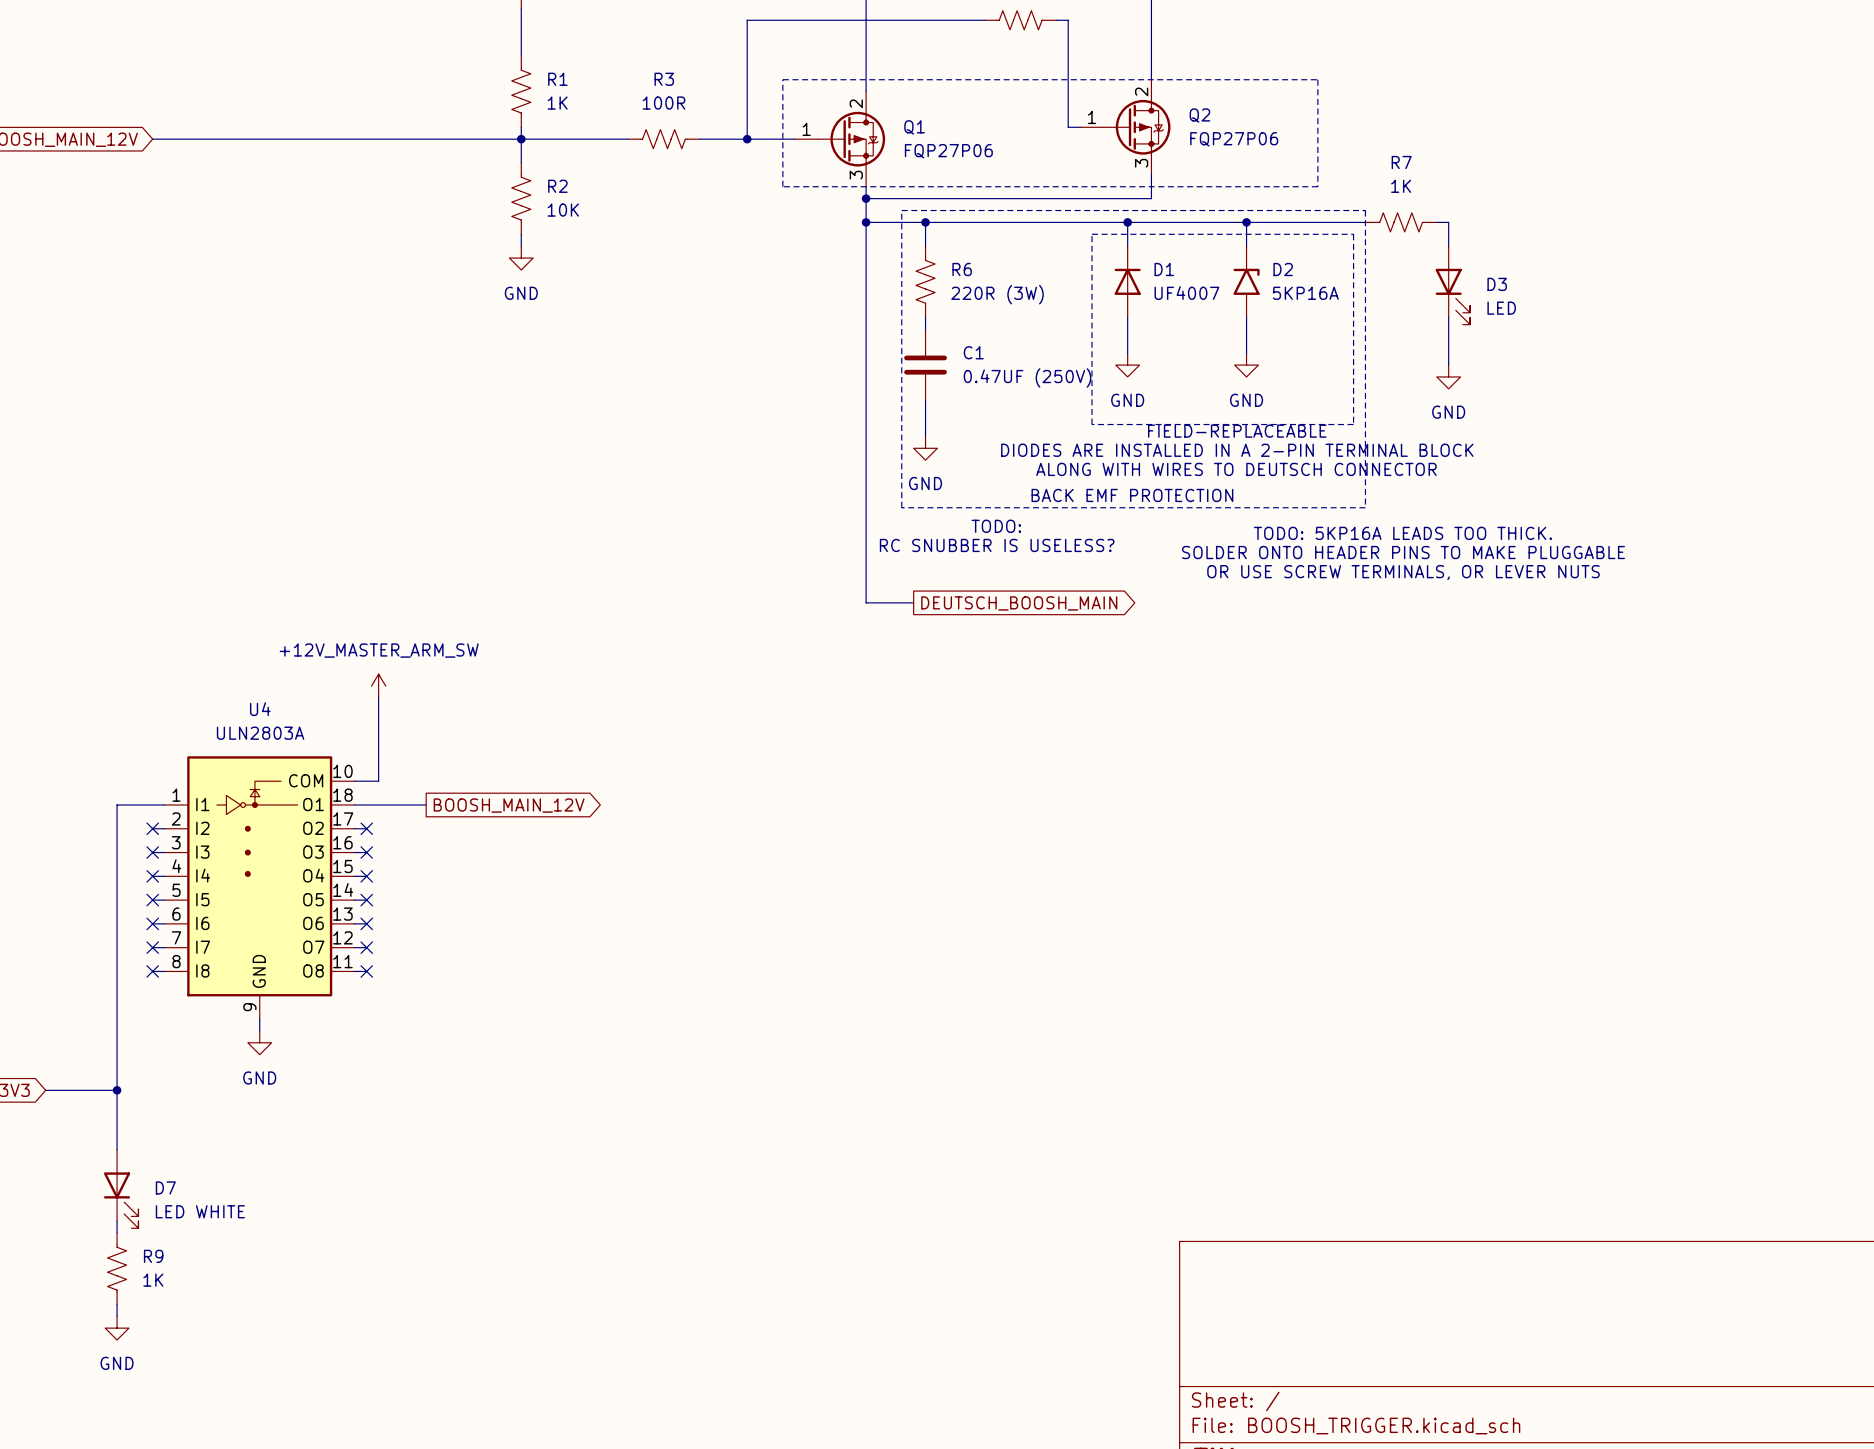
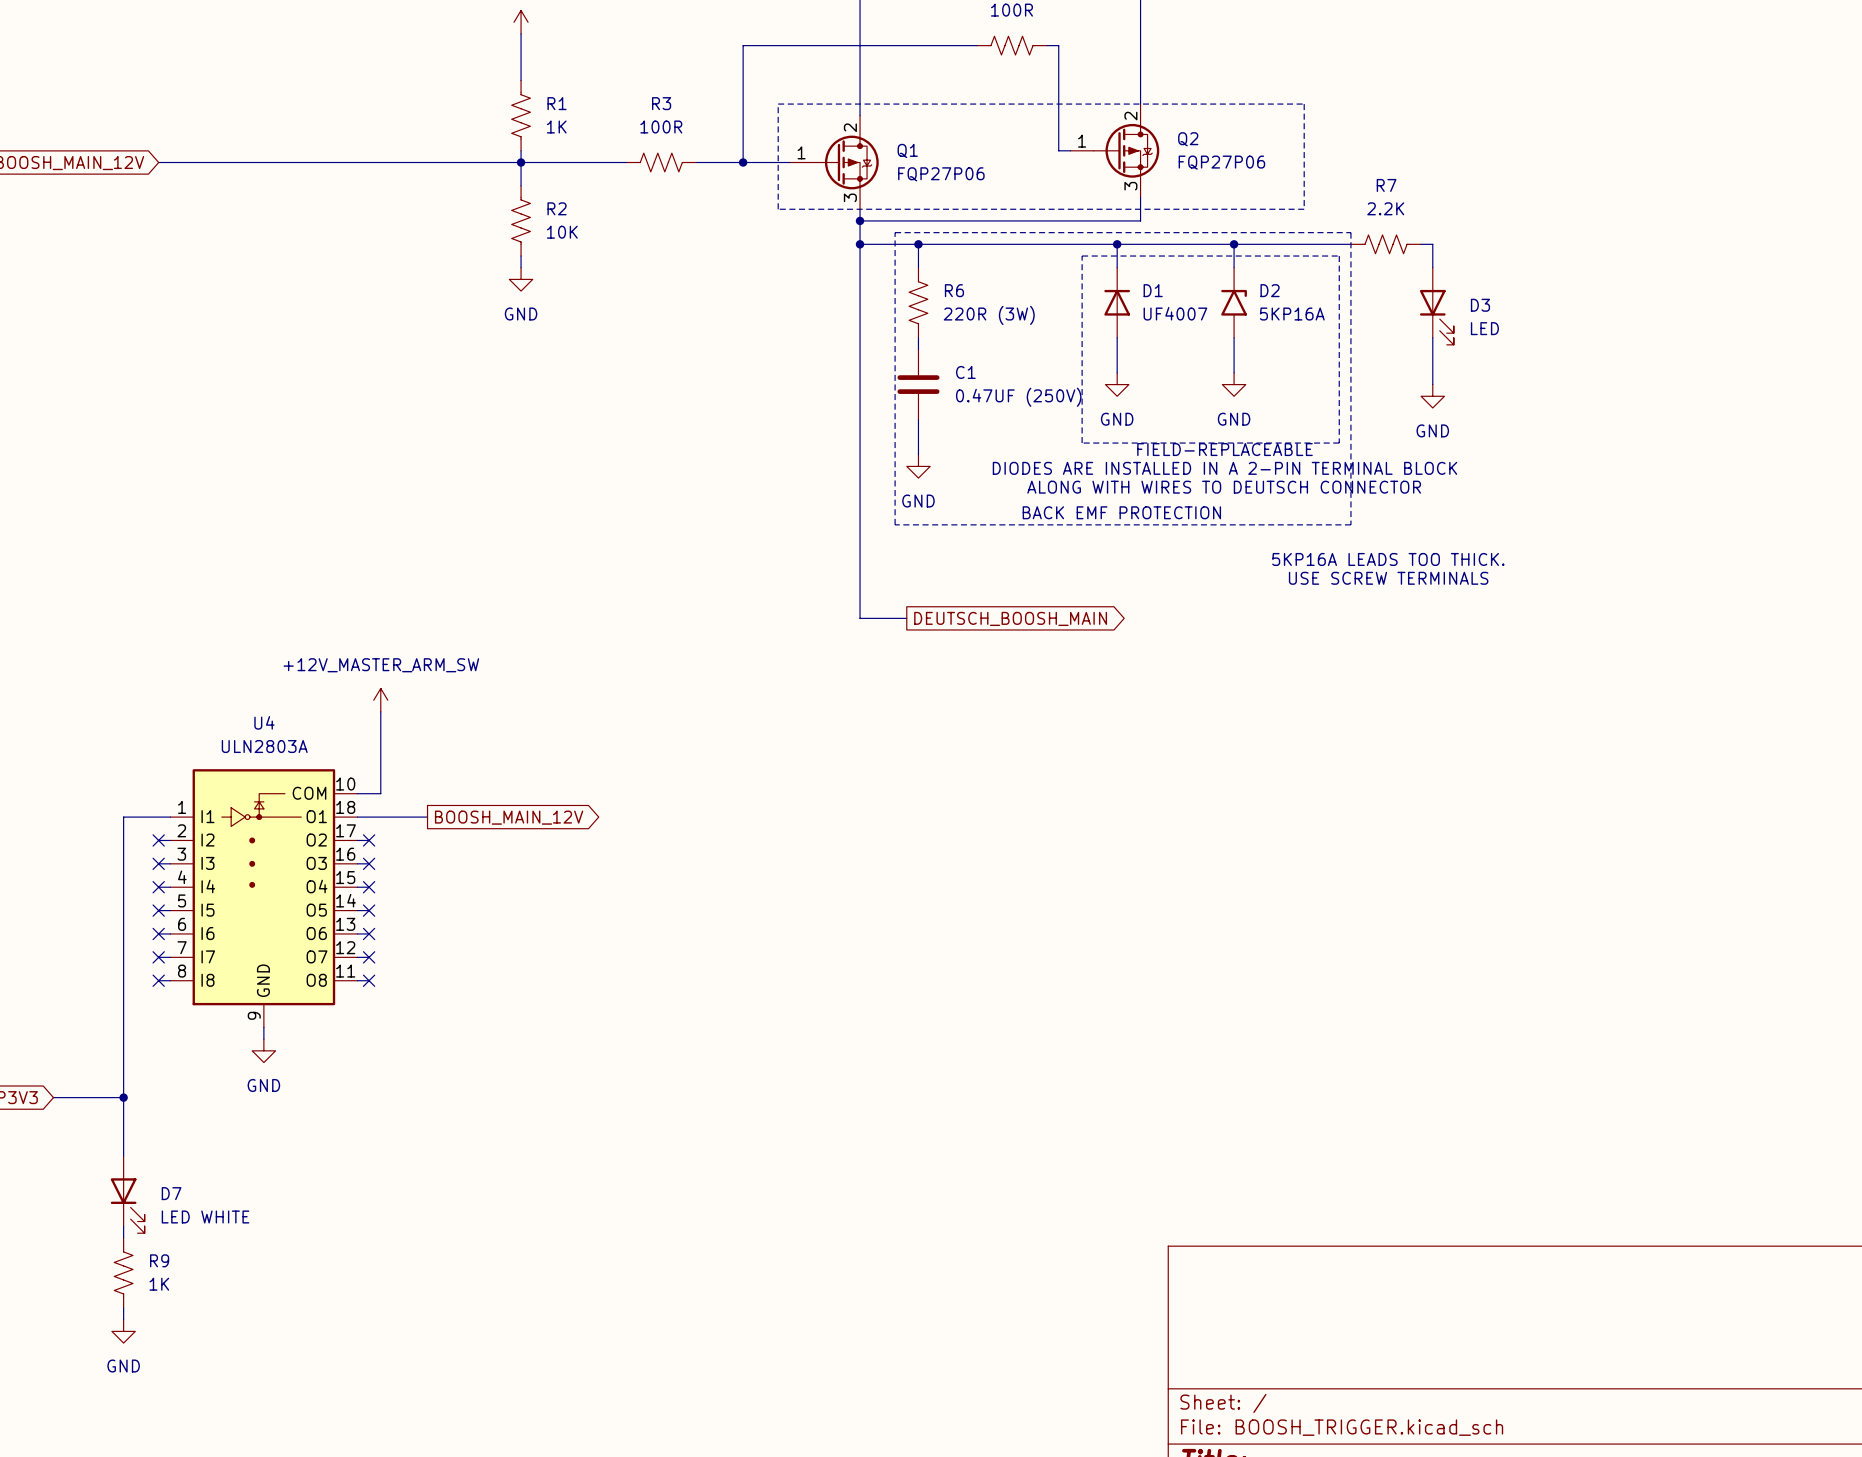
R7 value: 1K (1401, 186) -> 2.2K (1385, 208)
text: TODO: (996, 526) -> none
text: TODO: 5KP16A LEADS TOO THICK. (1402, 533) -> 5KP16A LEADS TOO THICK. (1388, 559)
text: RC SNUBBER IS USELESS? (997, 545) -> none
text: SOLDER ONTO HEADER PINS TO MAKE PLUGGABLE (1403, 552) -> none
text: OR USE SCREW TERMINALS, OR LEVER NUTS (1403, 572) -> USE SCREW TERMINALS (1388, 578)

